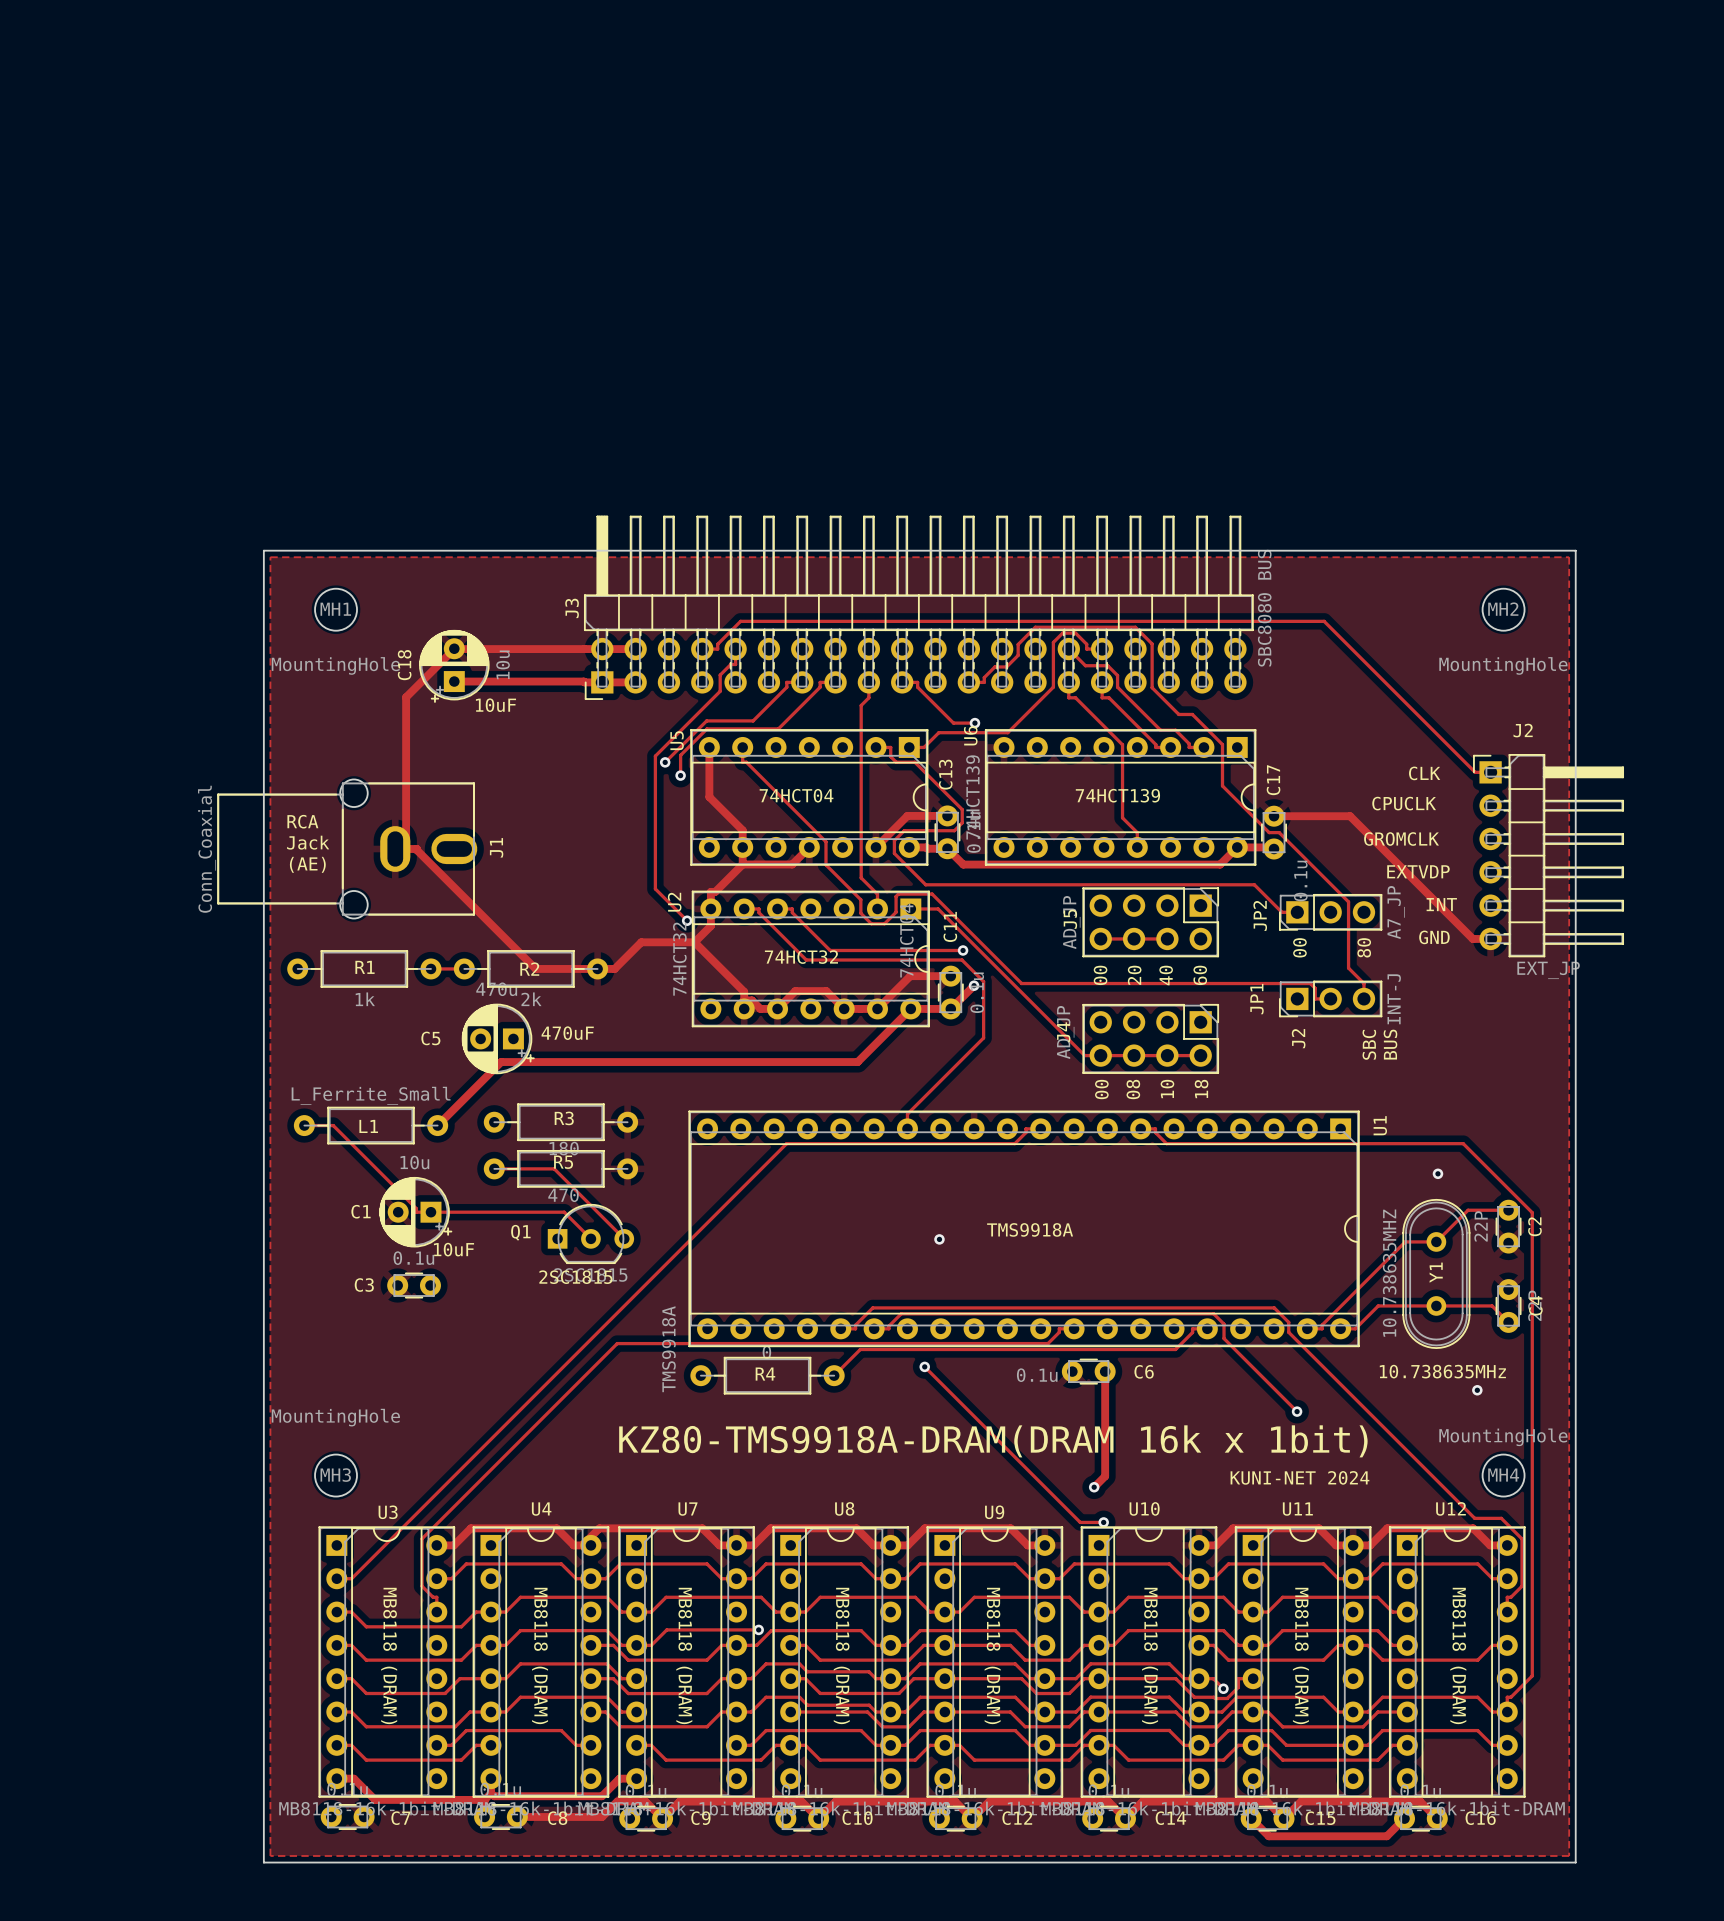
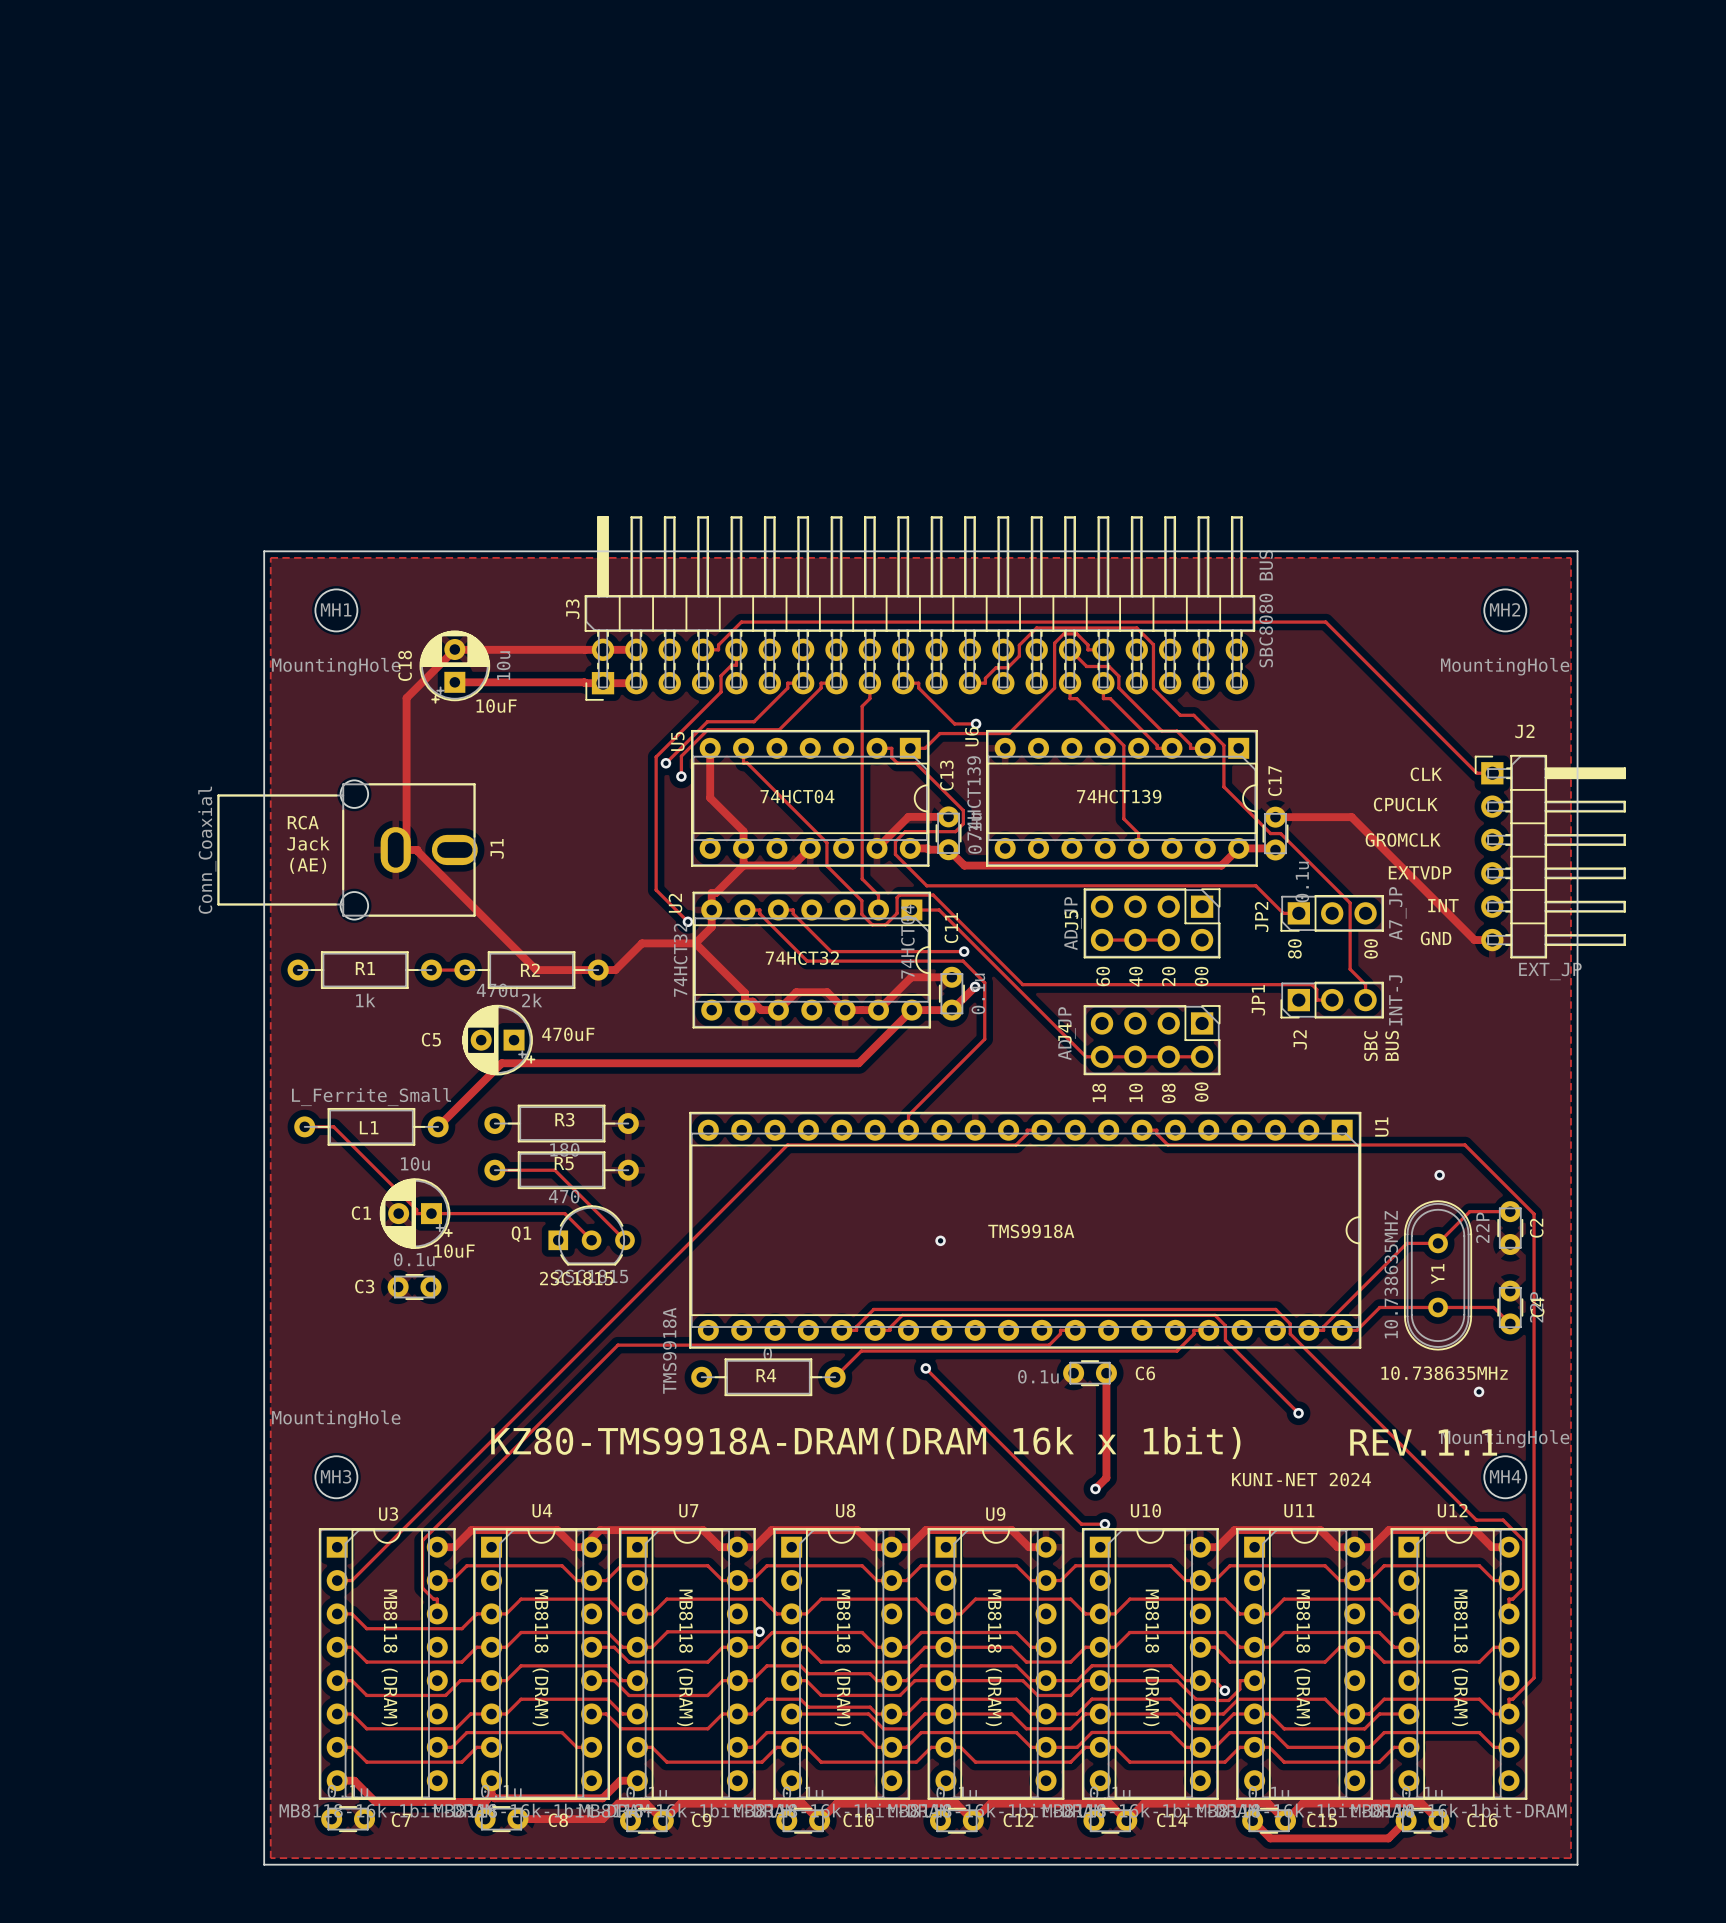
text: 00 (1299, 947) -> 80 (1294, 948)
text: 80 (1364, 947) -> 00 (1371, 948)
text: 00 (1100, 975) -> 60 (1103, 976)
text: 20 (1134, 975) -> 40 (1135, 976)
text: 40 (1166, 975) -> 20 (1168, 976)
text: 60 (1200, 975) -> 00 (1201, 976)
text: 00 (1101, 1089) -> 18 (1099, 1092)
text: 08 (1133, 1089) -> 10 (1135, 1092)
text: 10 (1167, 1089) -> 08 (1168, 1093)
text: 18 (1201, 1089) -> 00 (1201, 1092)
text: none -> REV.1.1 (1423, 1442)
text position: KZ80-TMS9918A-DRAM(DRAM 16k x 1bit) (993, 1441) -> KZ80-TMS9918A-DRAM(DRAM 16k x 1bit) (865, 1443)

